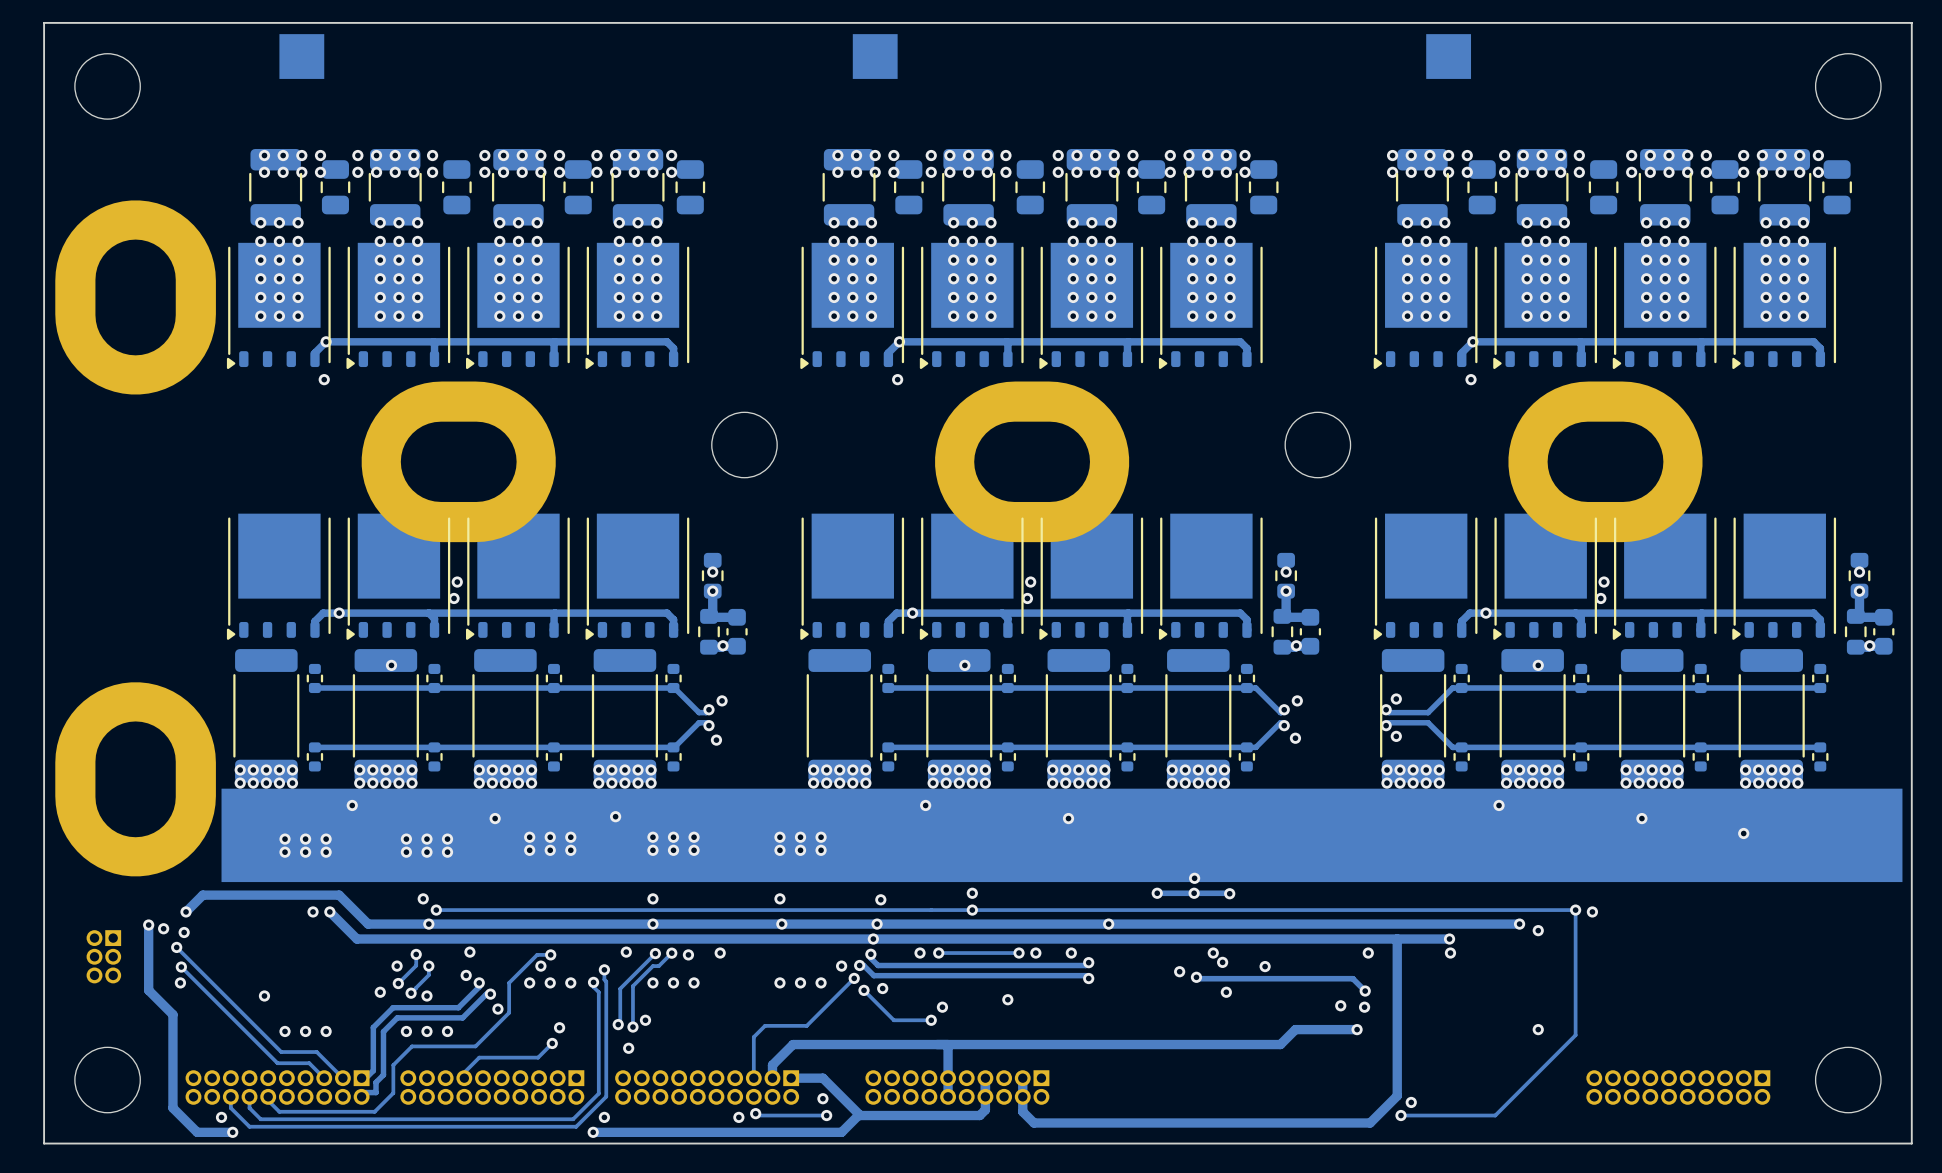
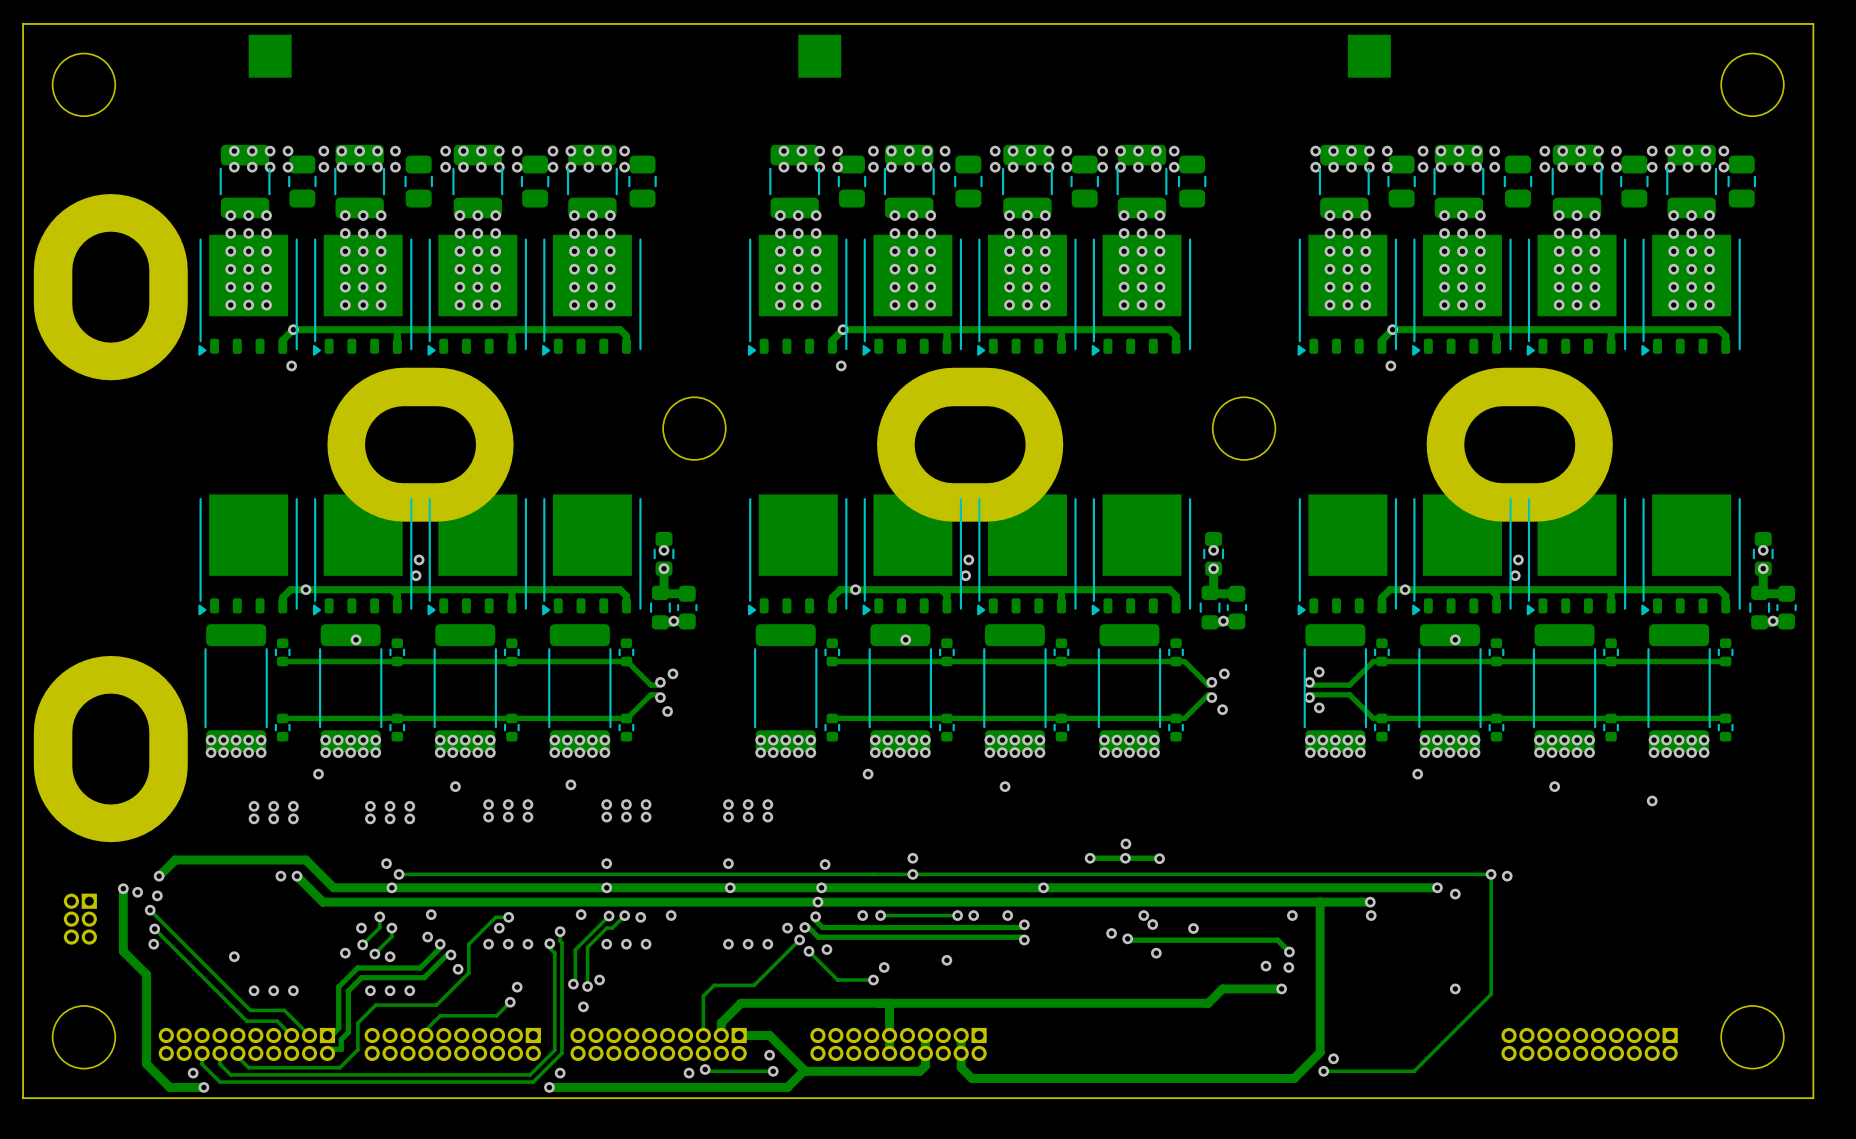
part: (1061, 835) -> none

